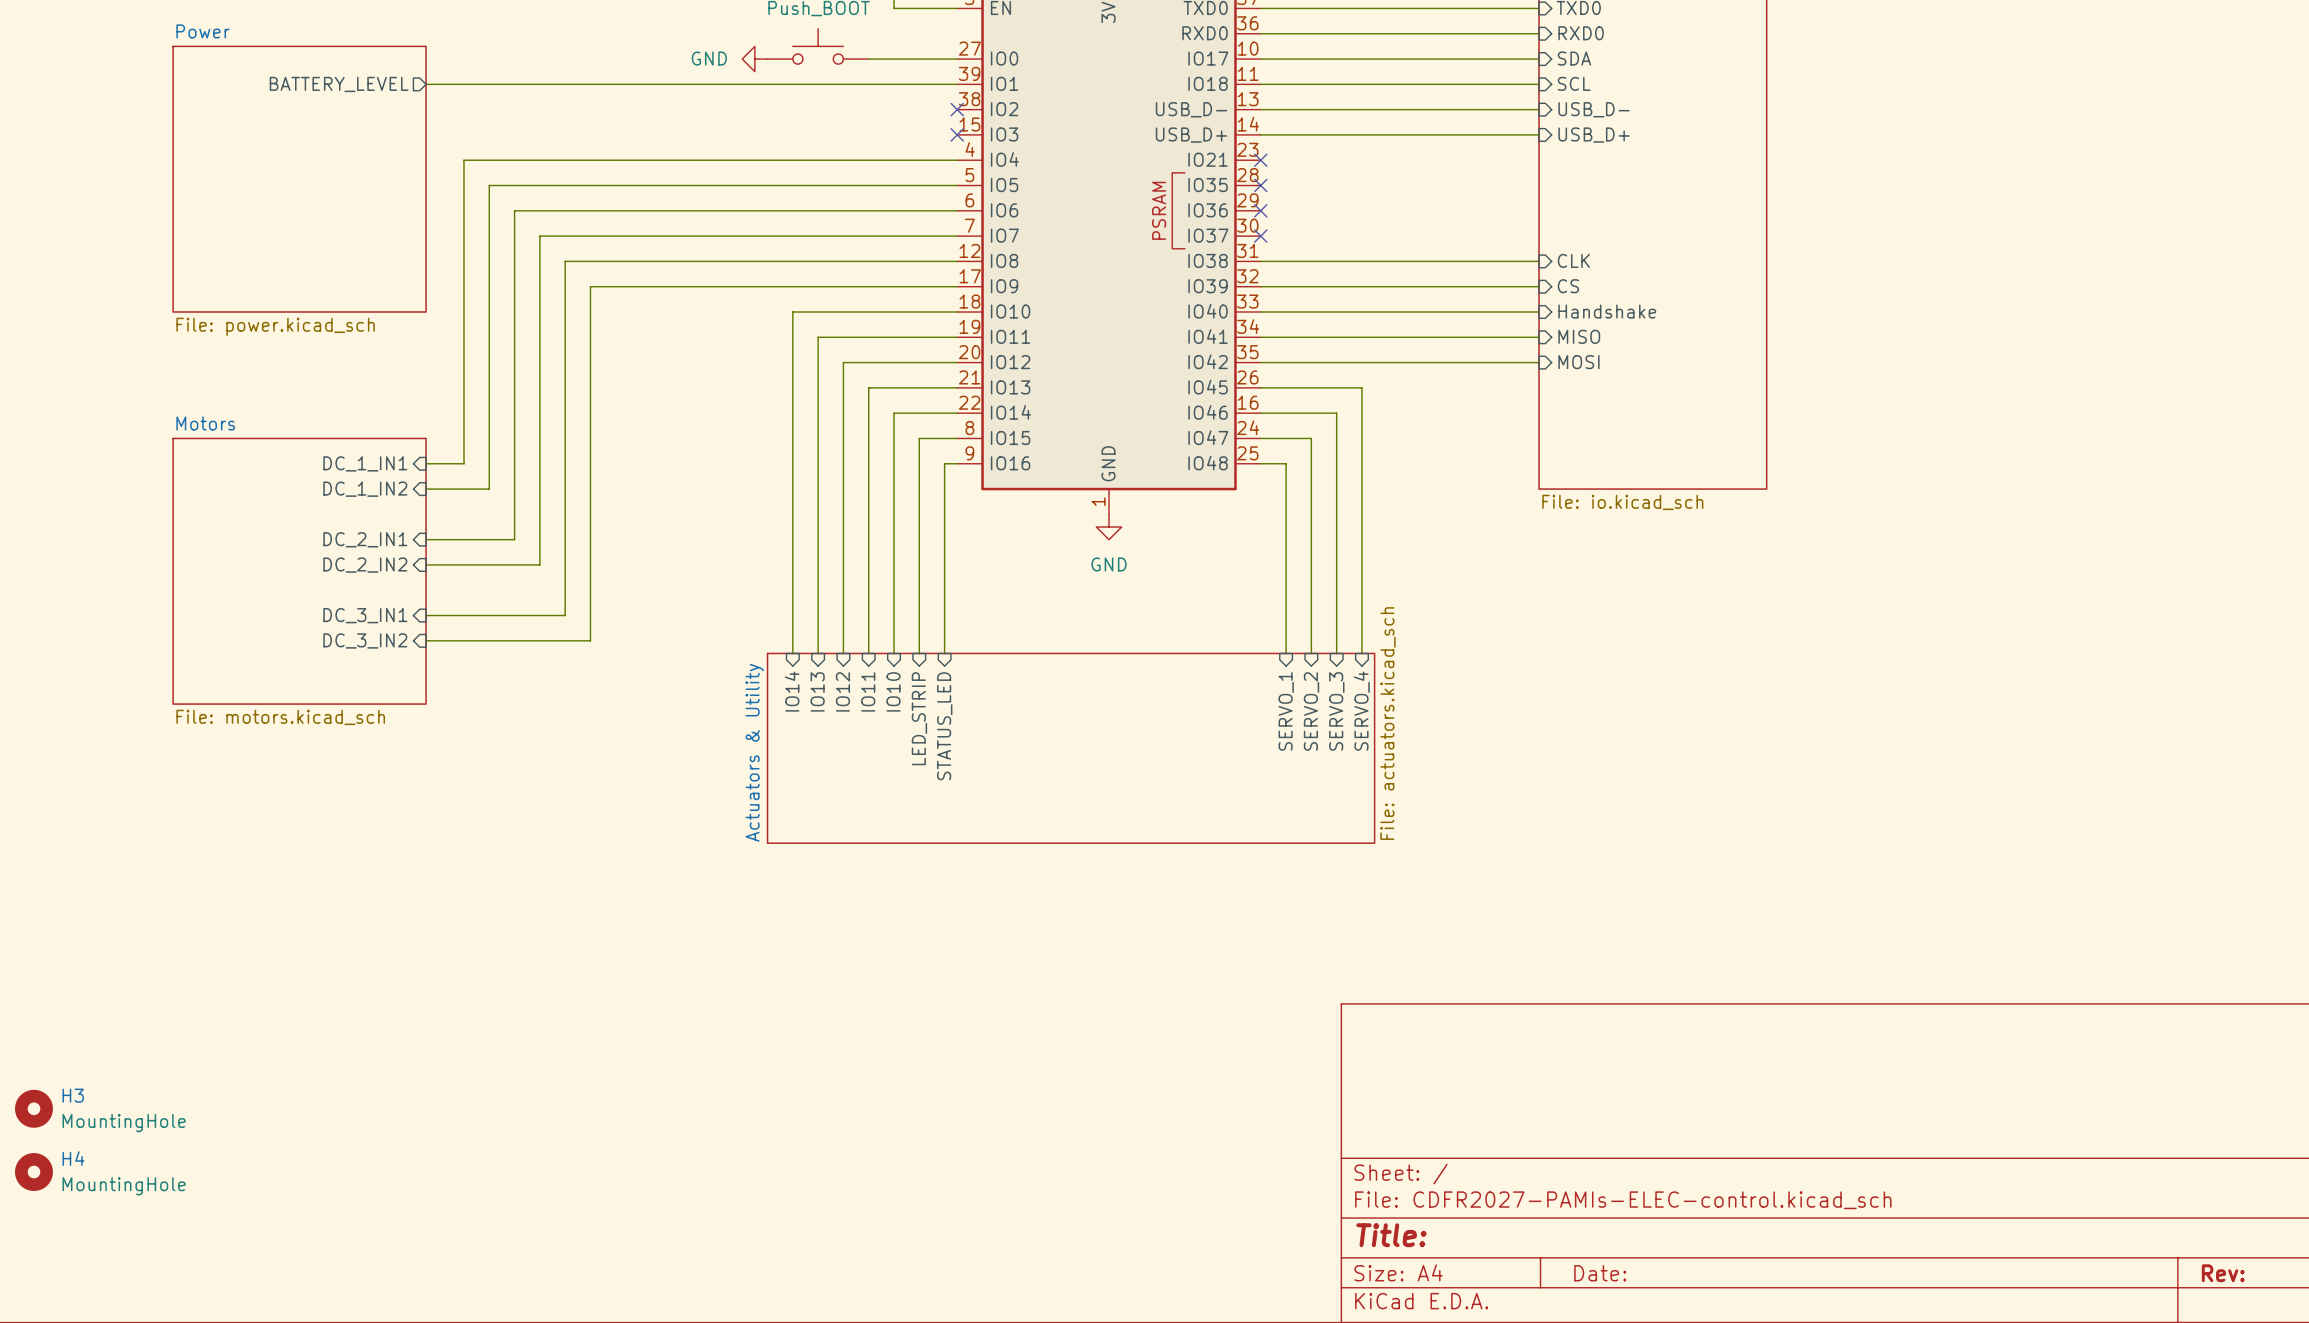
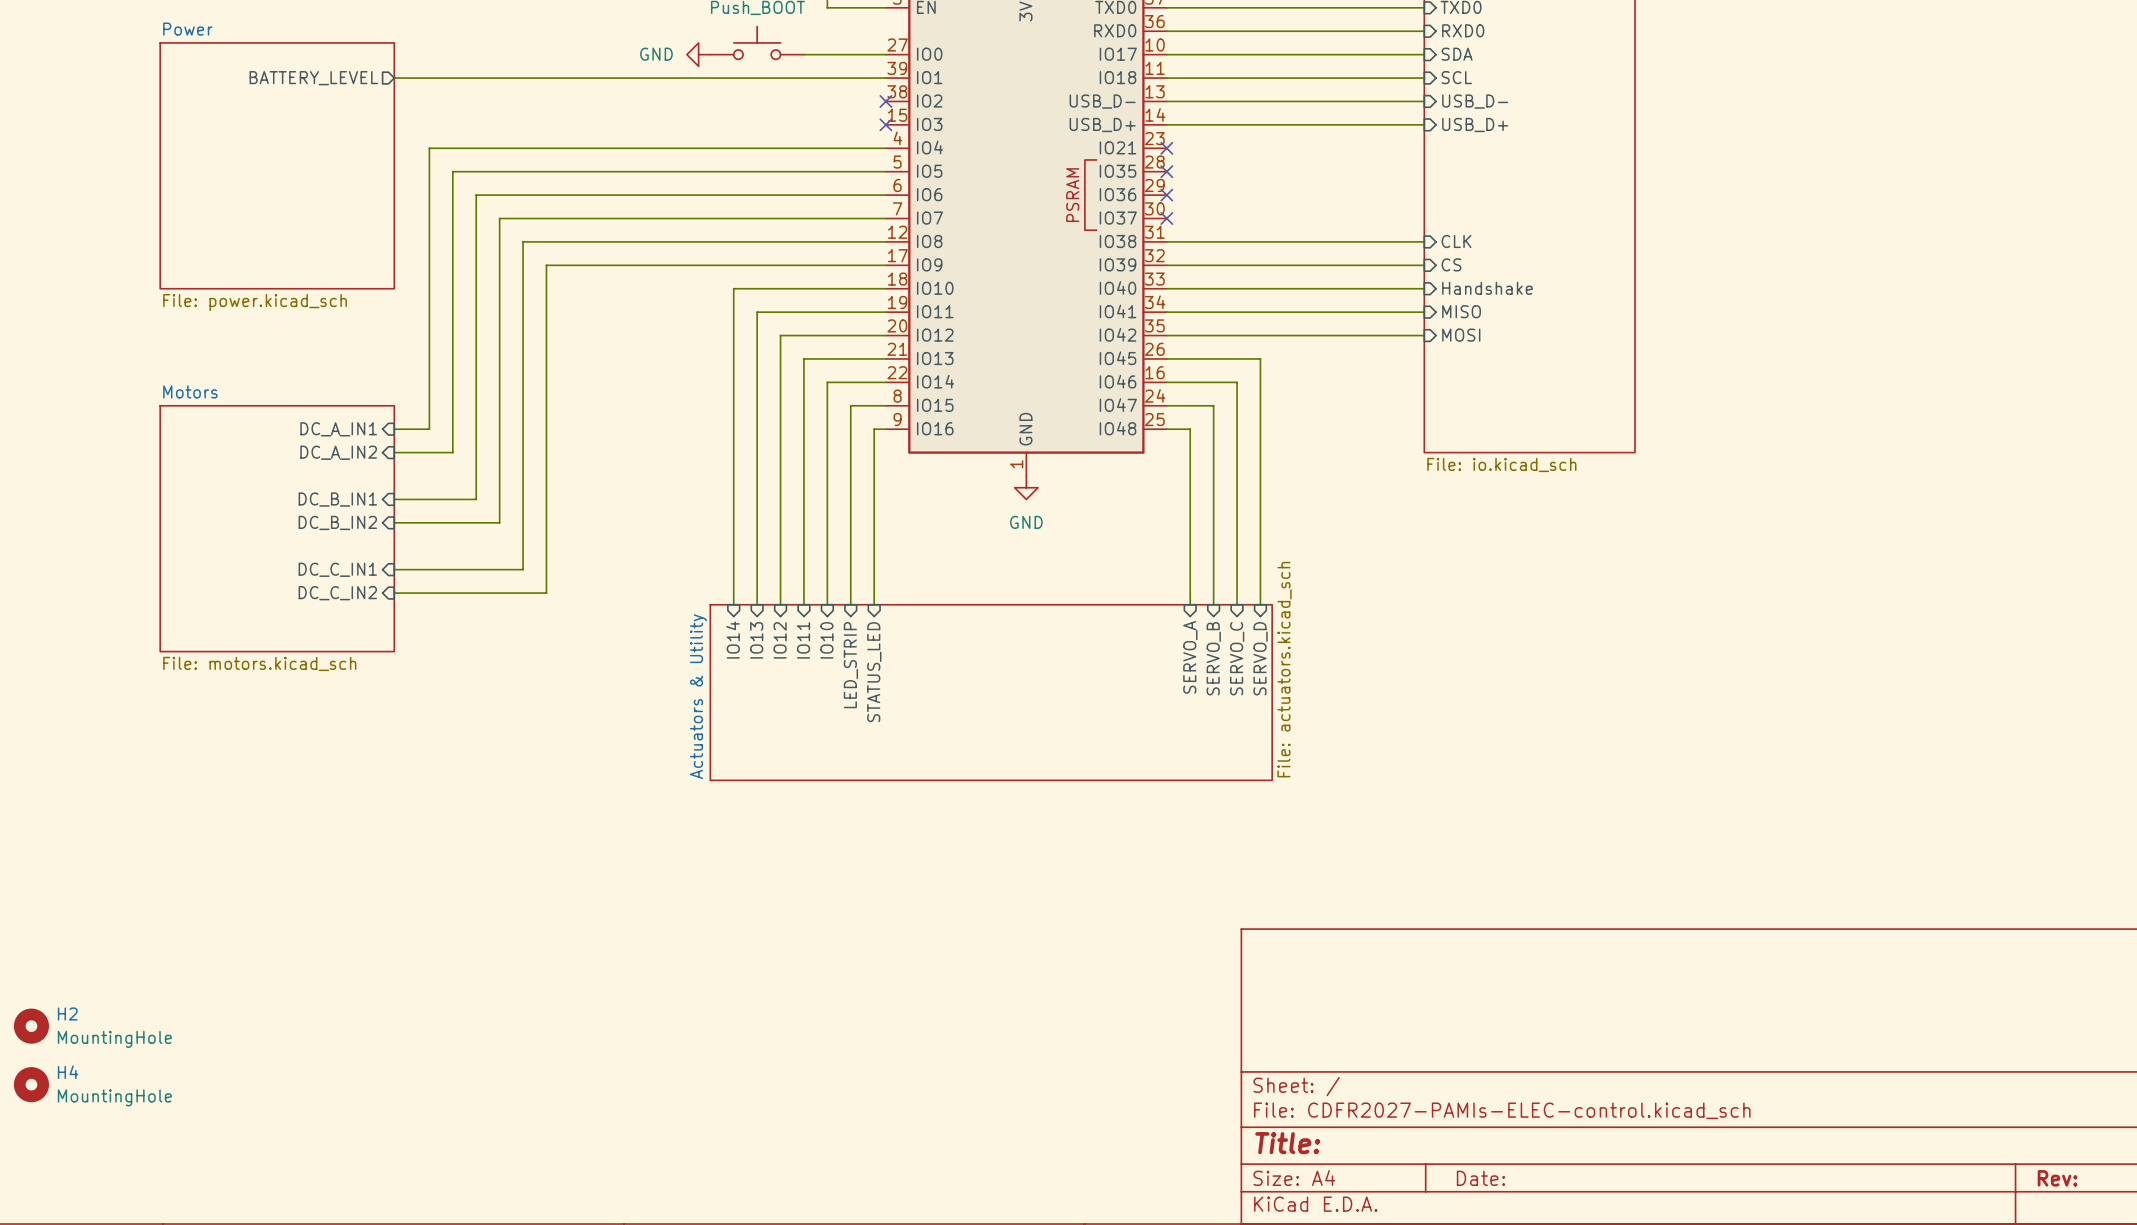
sheet pin: DC_1_IN1 (365, 463) -> DC_A_IN1 (338, 429)
sheet pin: DC_1_IN2 (365, 489) -> DC_A_IN2 (338, 452)
sheet pin: DC_2_IN1 (365, 539) -> DC_B_IN1 (337, 499)
sheet pin: DC_2_IN2 (365, 565) -> DC_B_IN2 (337, 522)
sheet pin: DC_3_IN1 (365, 615) -> DC_C_IN1 (337, 569)
sheet pin: DC_3_IN2 (365, 640) -> DC_C_IN2 (337, 593)
sheet pin: SERVO_1 (1286, 711) -> SERVO_A (1190, 657)
sheet pin: SERVO_2 (1311, 711) -> SERVO_B (1213, 658)
sheet pin: SERVO_3 (1336, 711) -> SERVO_C (1237, 658)
sheet pin: SERVO_4 (1361, 711) -> SERVO_D (1260, 658)
H3 name: H3 (73, 1095) -> H2 (67, 1013)

